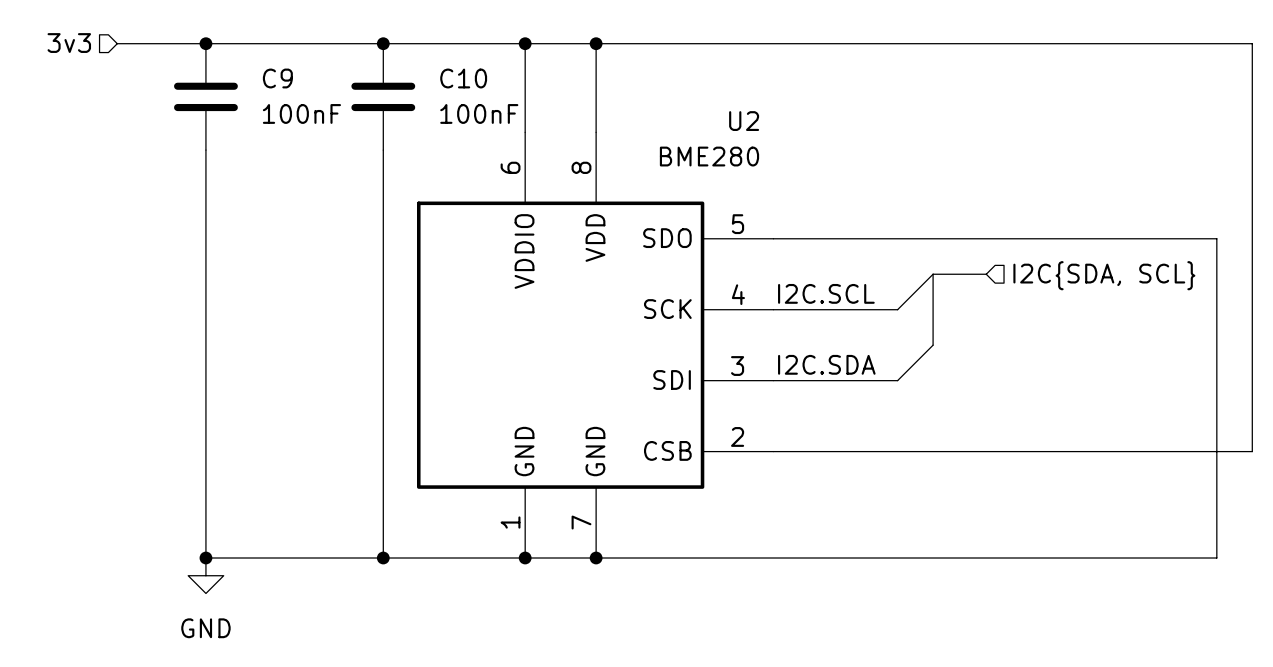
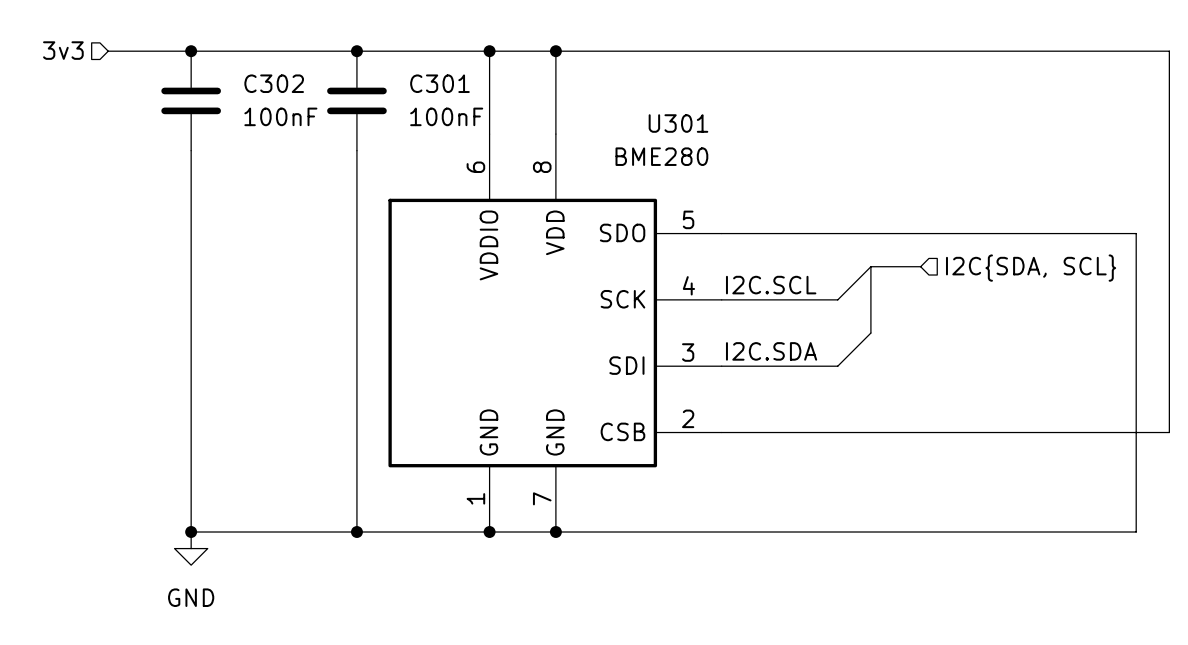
C9 name: C9 (277, 78) -> C302 (274, 83)
C10 name: C10 (463, 78) -> C301 (439, 83)
U2 name: U2 (744, 121) -> U301 (678, 123)

